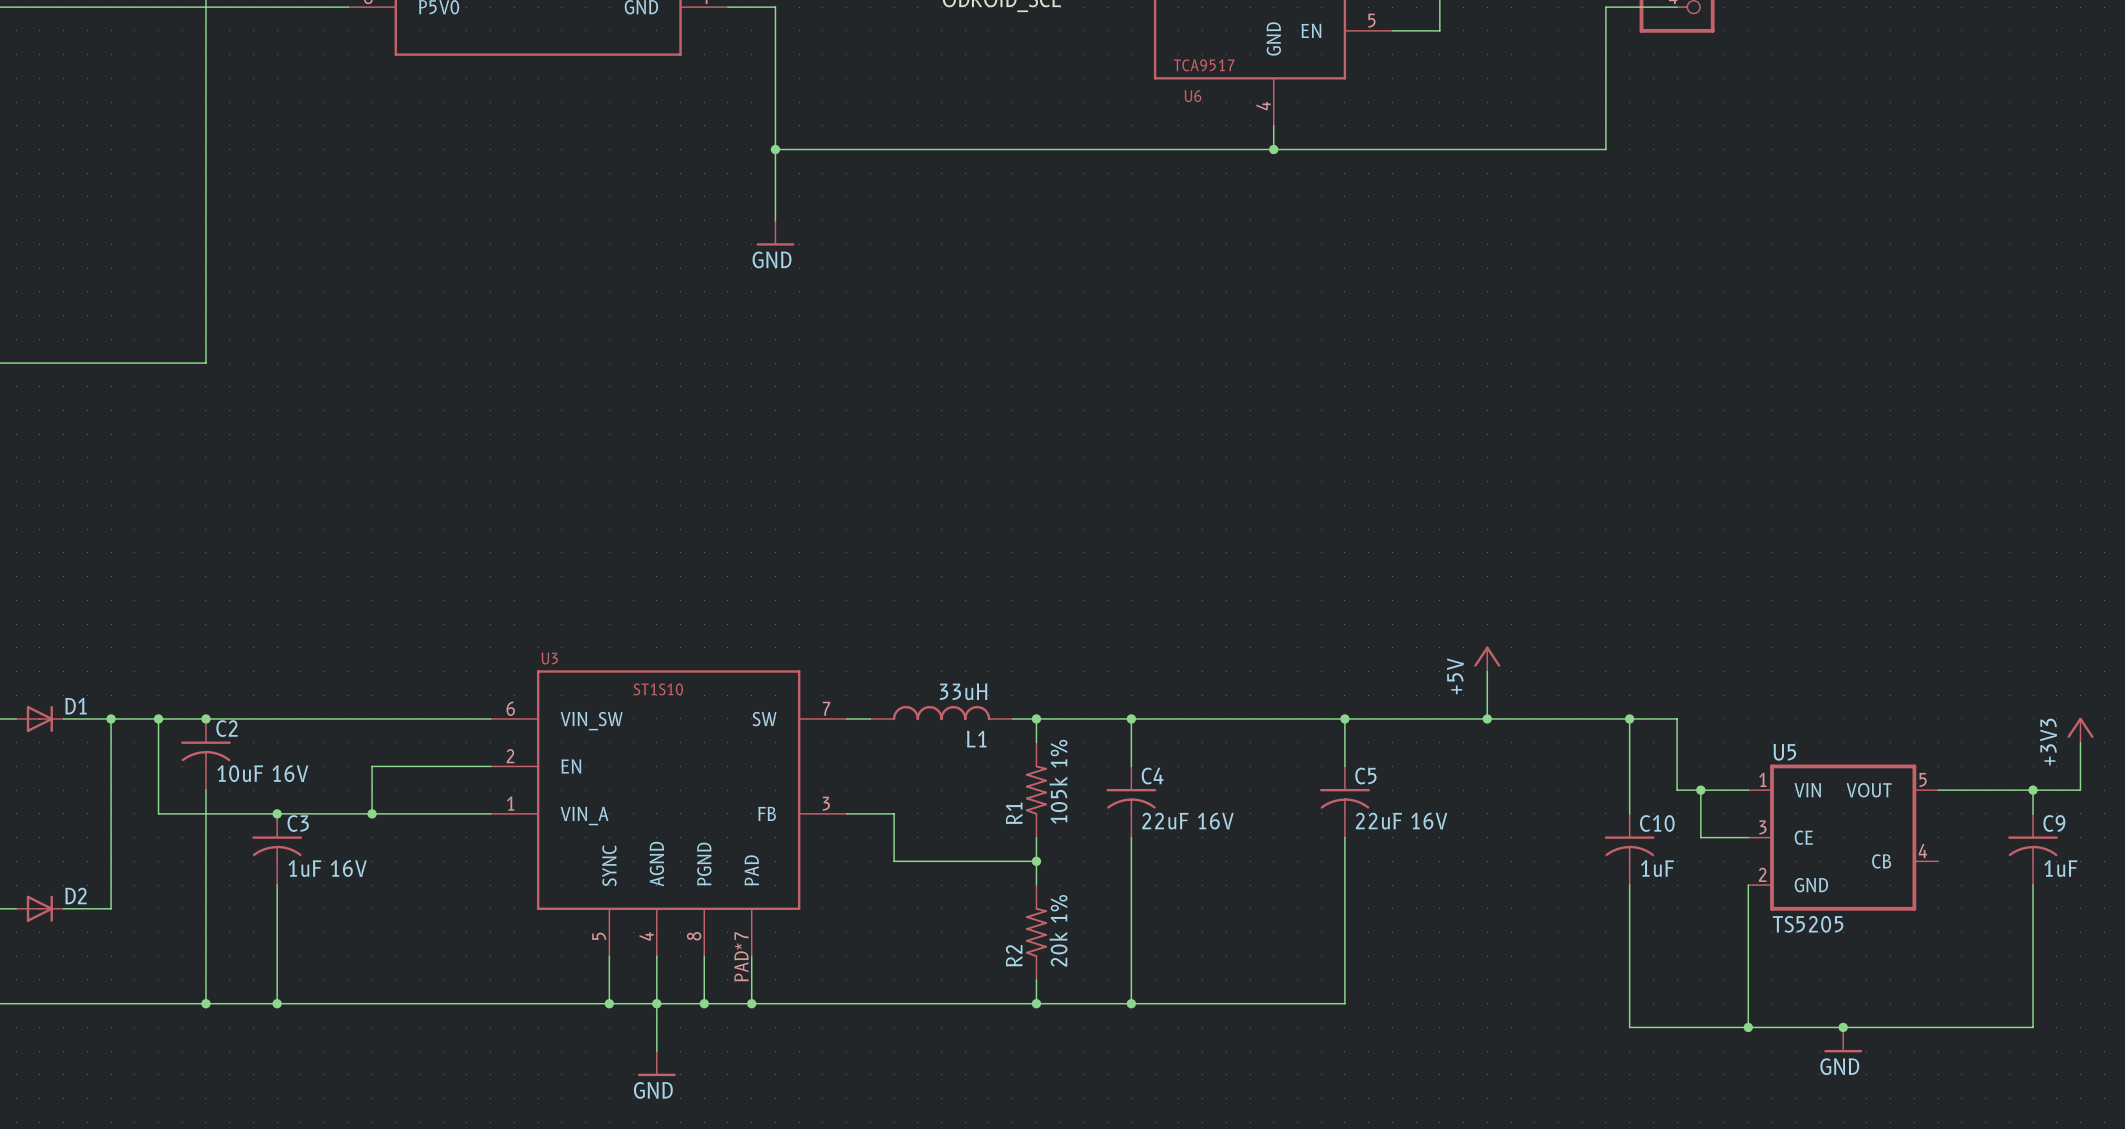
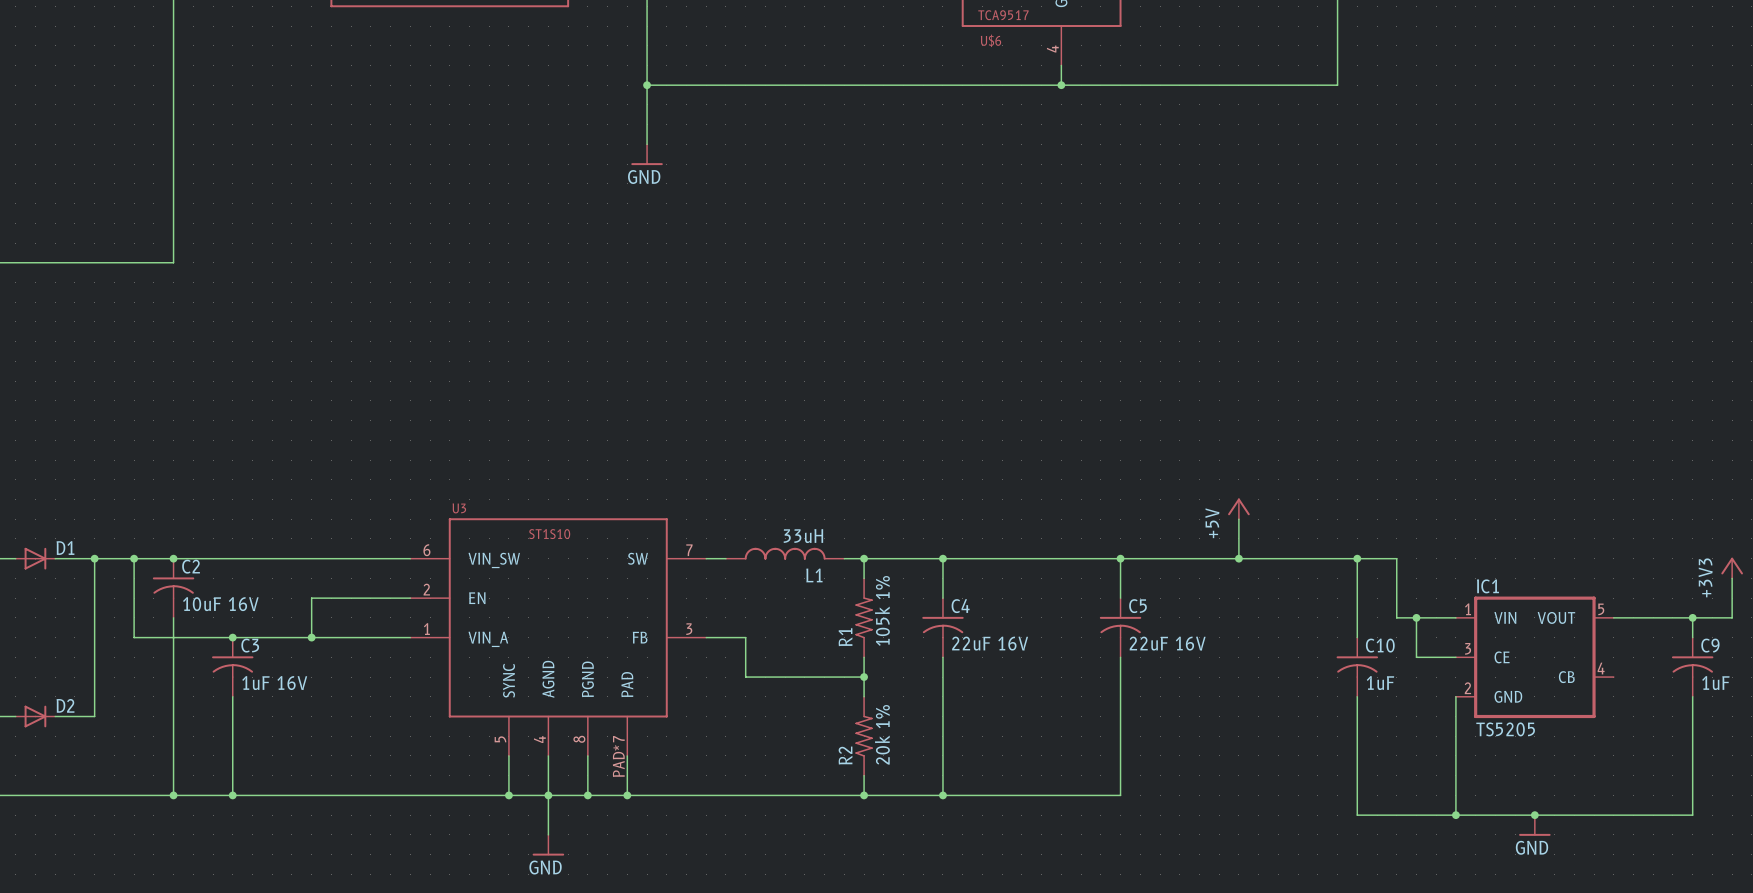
U6 name: U6 (1192, 96) -> U$6 (991, 40)
U5 name: U5 (1784, 752) -> IC1 (1487, 586)

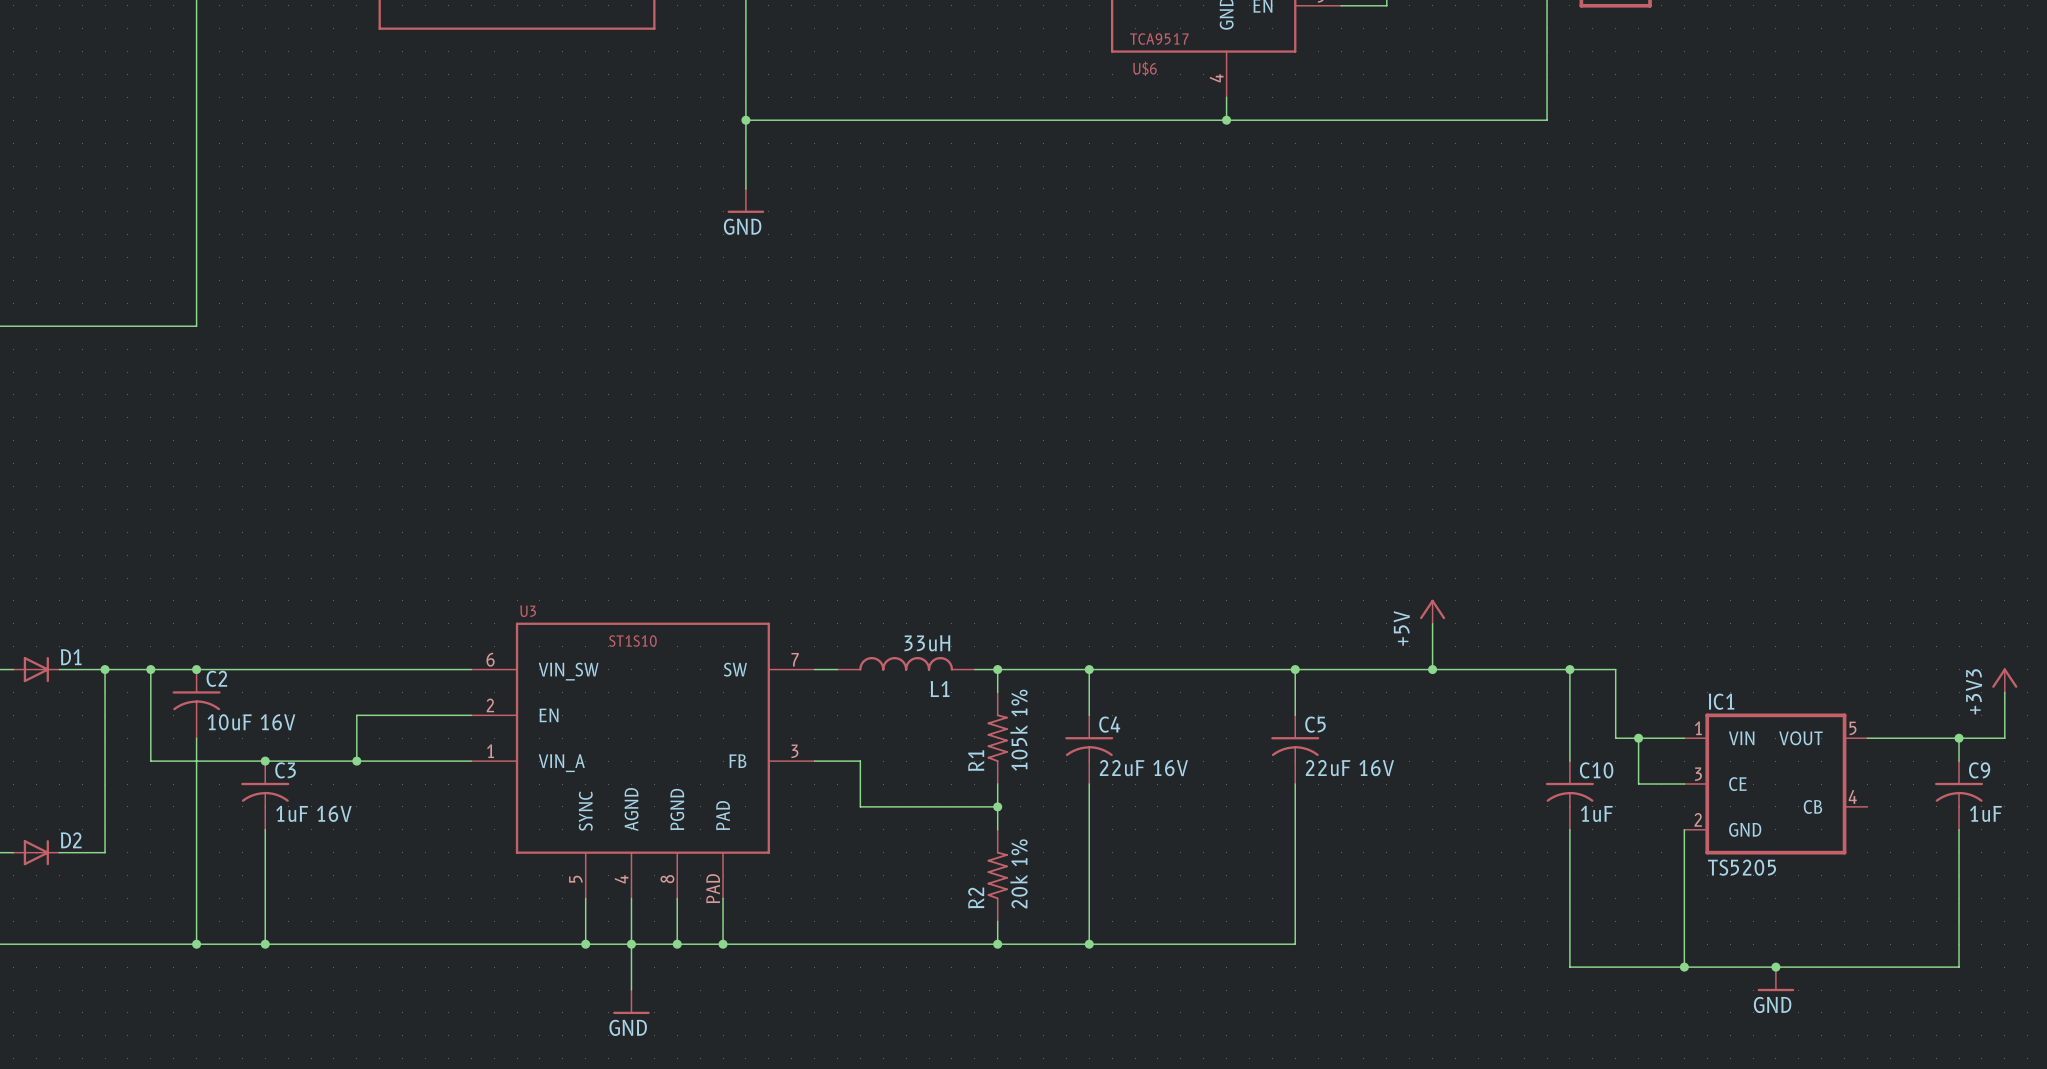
U3 pin number: PAD*7 (618, 756) -> PAD (713, 888)

